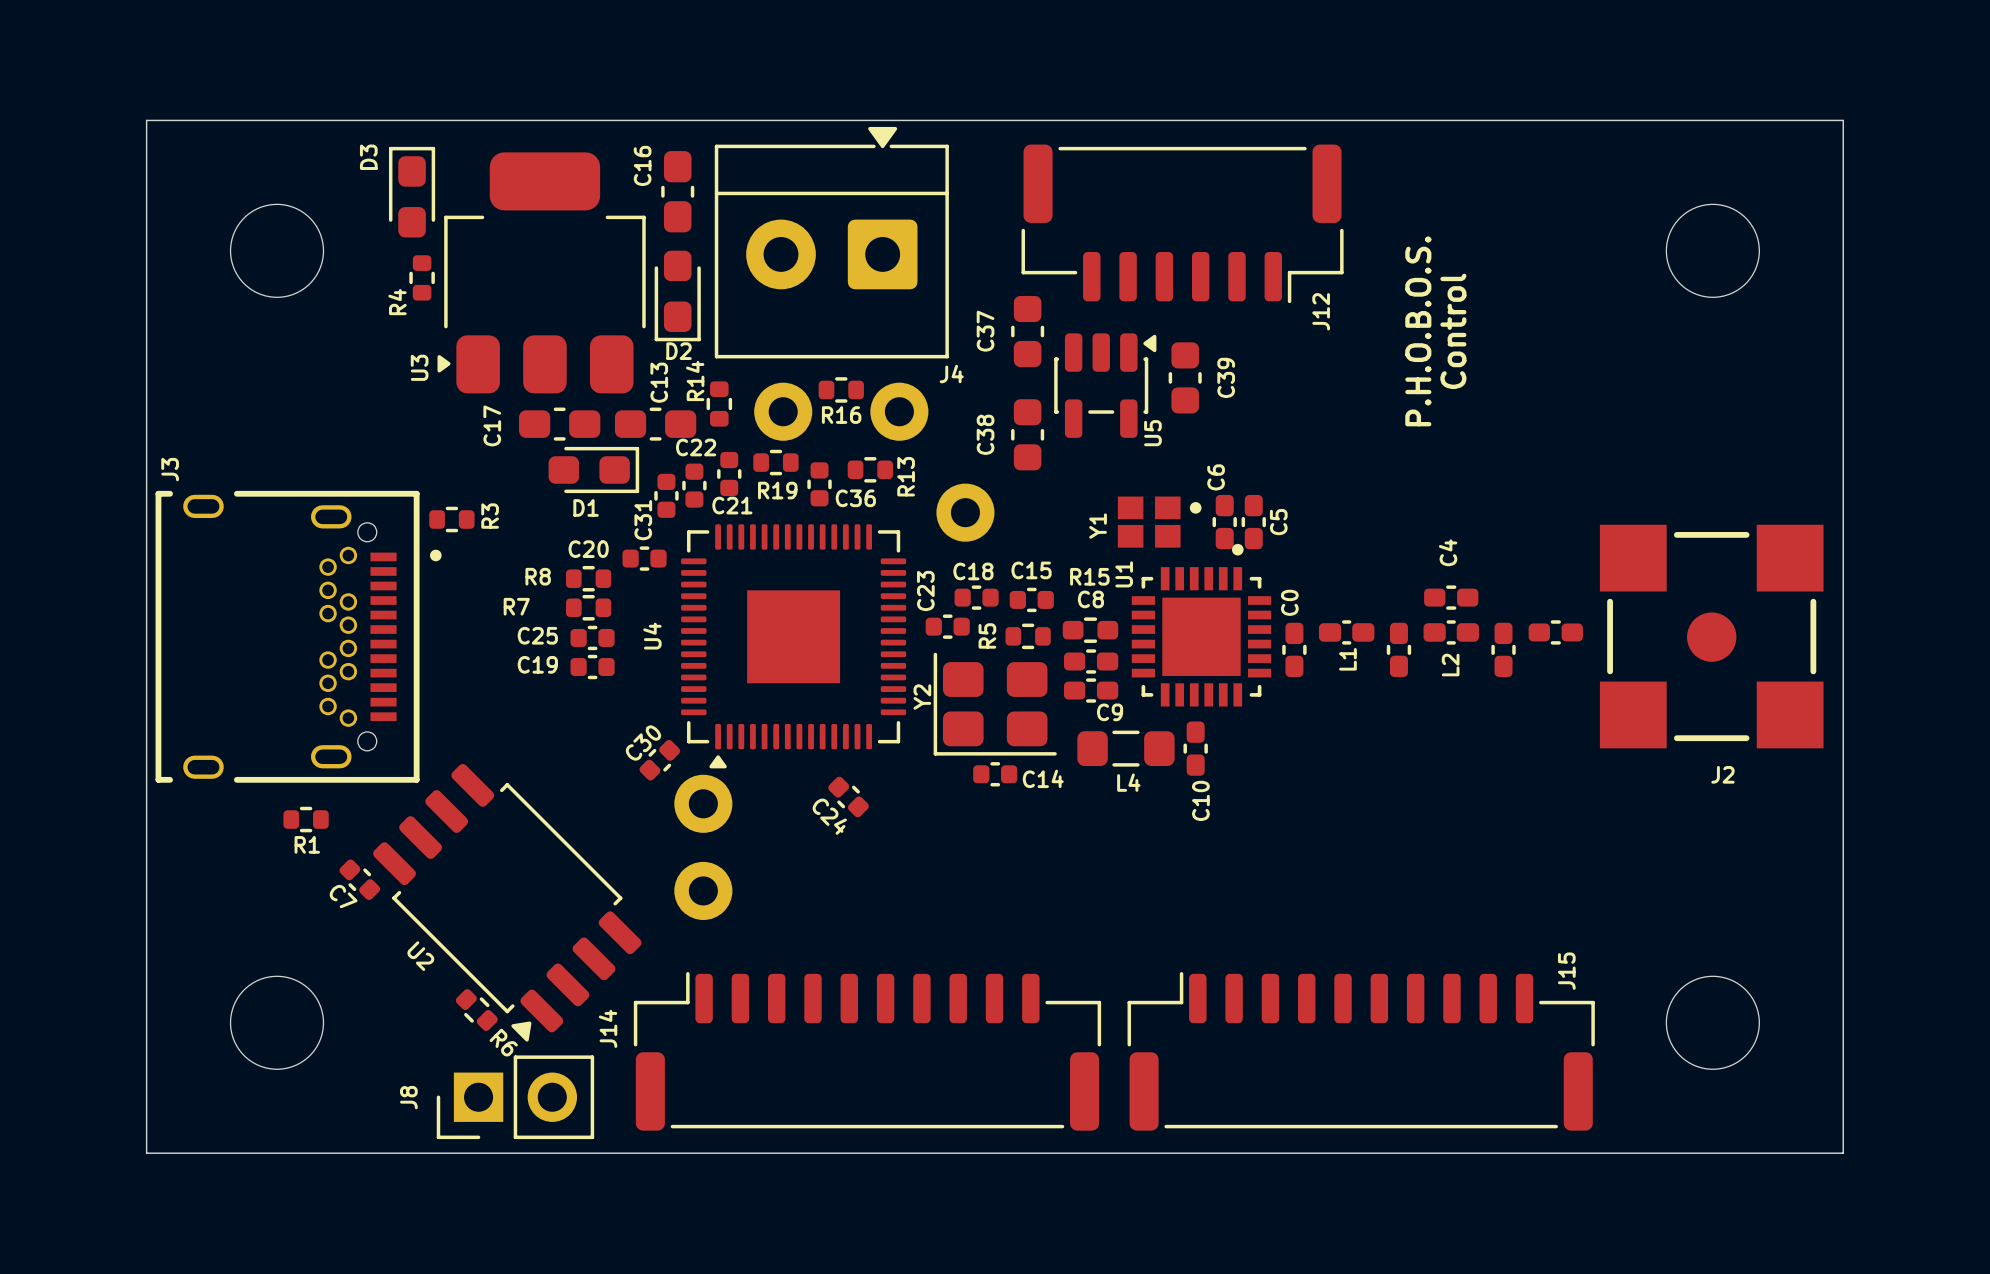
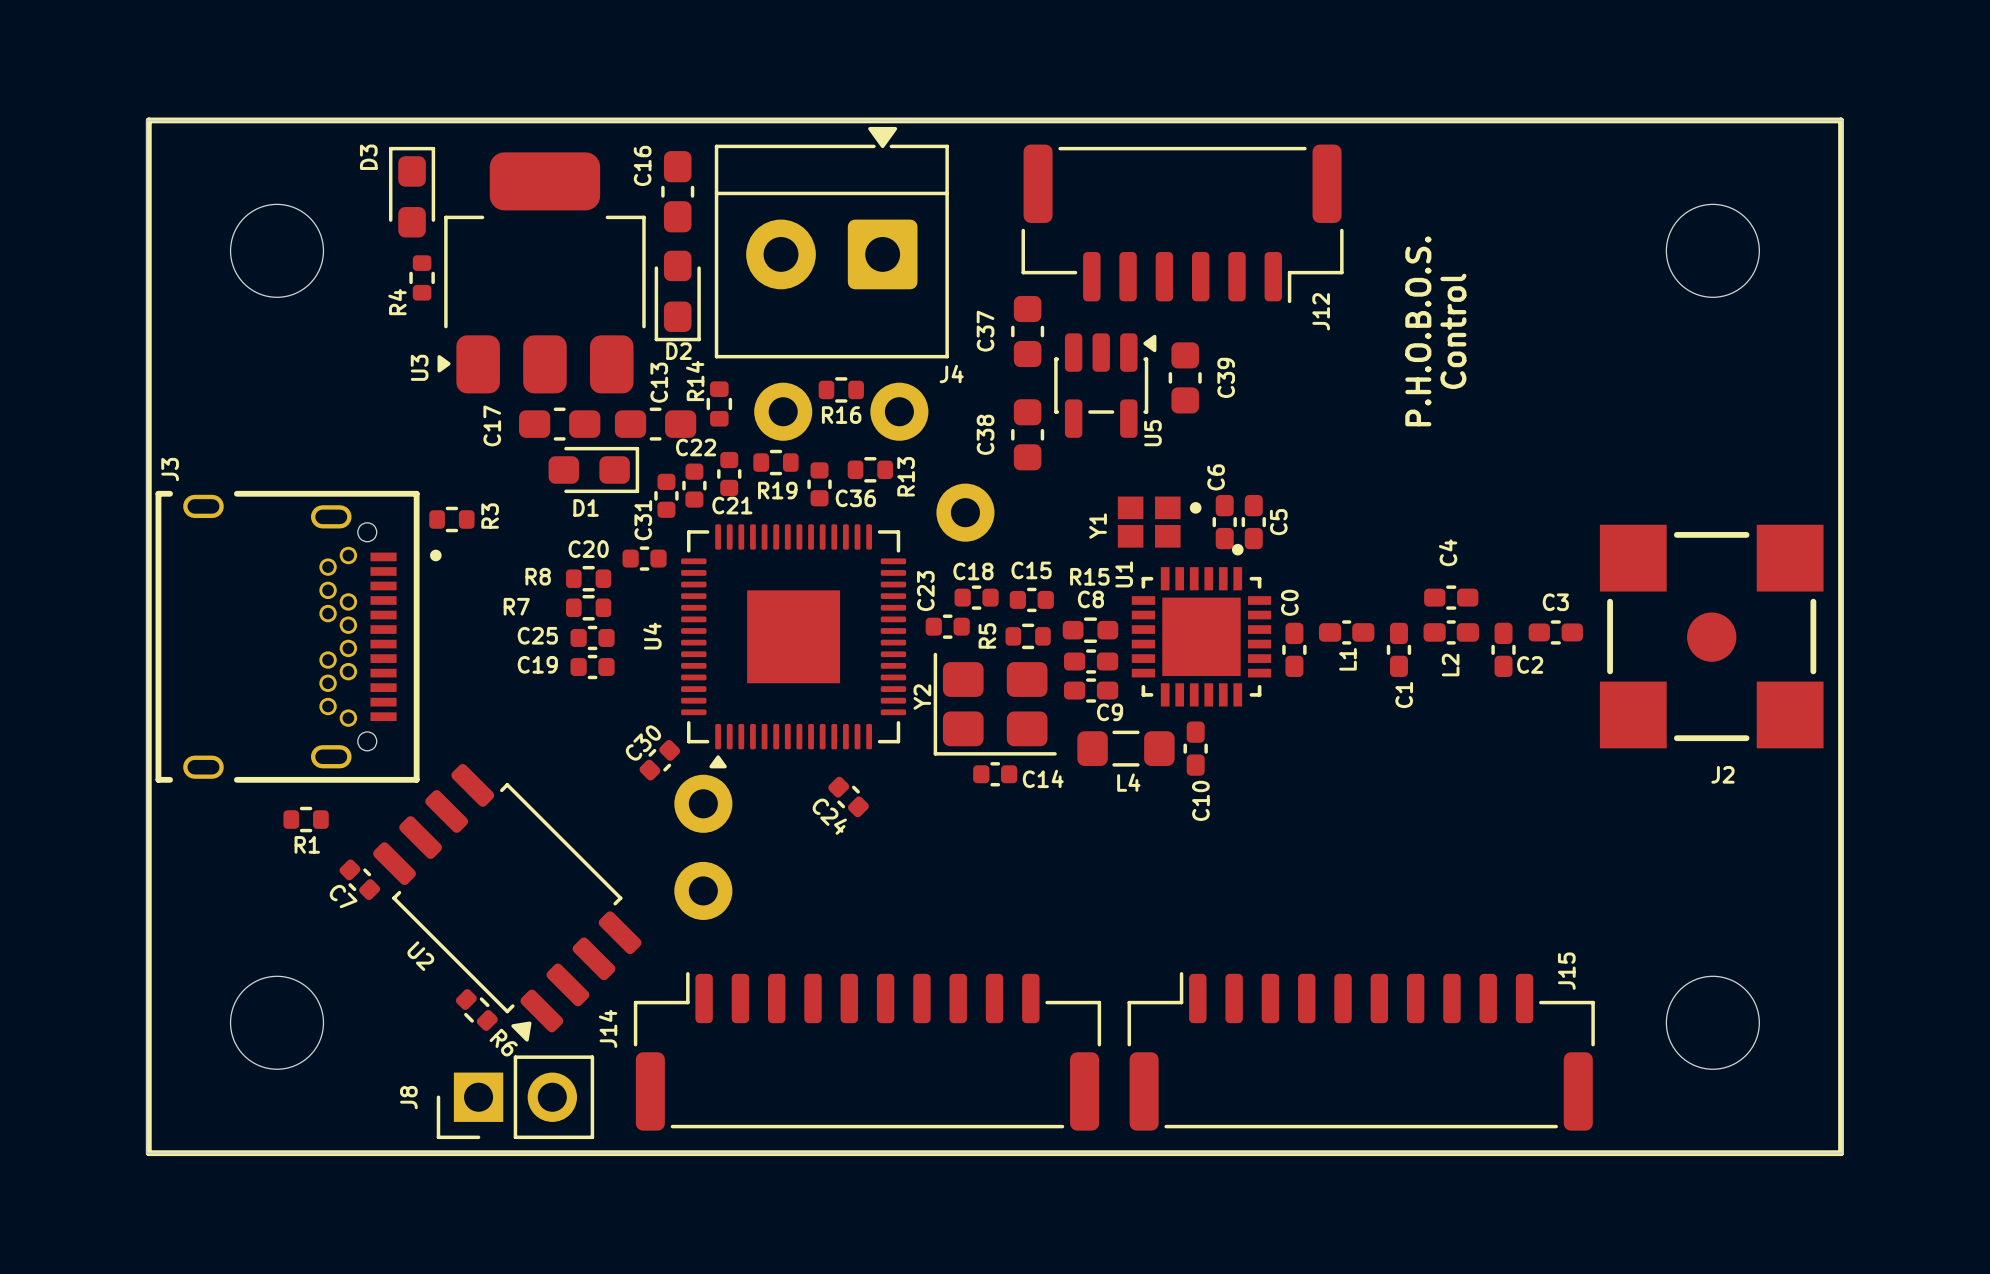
line: none -> (148, 120) (1841, 120) (1841, 1153) (148, 1153) (148, 120)
C3 name: none -> C3 (1555, 602)
C2 name: none -> C2 (1530, 664)
C1 name: none -> C1 (1404, 695)

